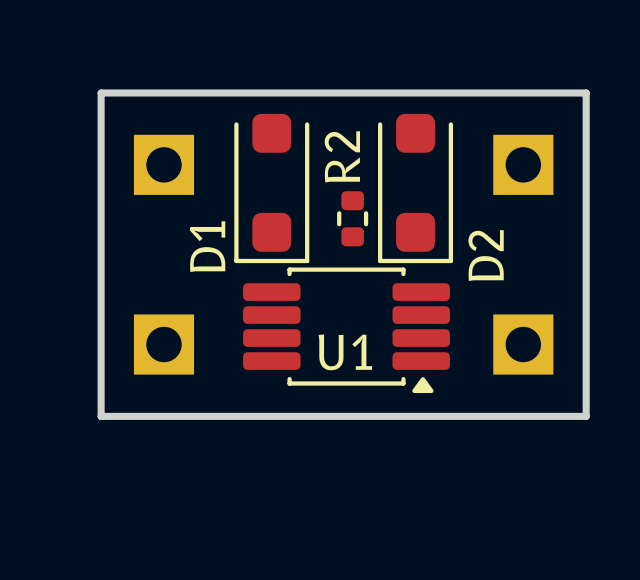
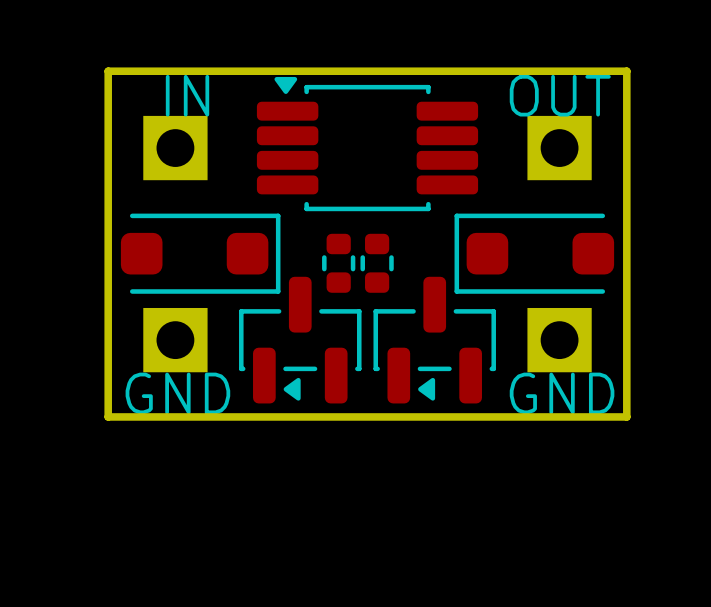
text: none -> IN (187, 95)
text: none -> OUT (560, 95)
part: none -> (367, 144)
D1: (271, 188) -> none
D2: (415, 188) -> none
R2: (352, 218) -> none
part: none -> (200, 253)
part: none -> (534, 253)
part: none -> (338, 263)
part: none -> (377, 263)
U1: (346, 330) -> none
part: none -> (300, 340)
part: none -> (434, 340)
text: none -> GND (177, 393)
text: none -> GND (562, 393)

